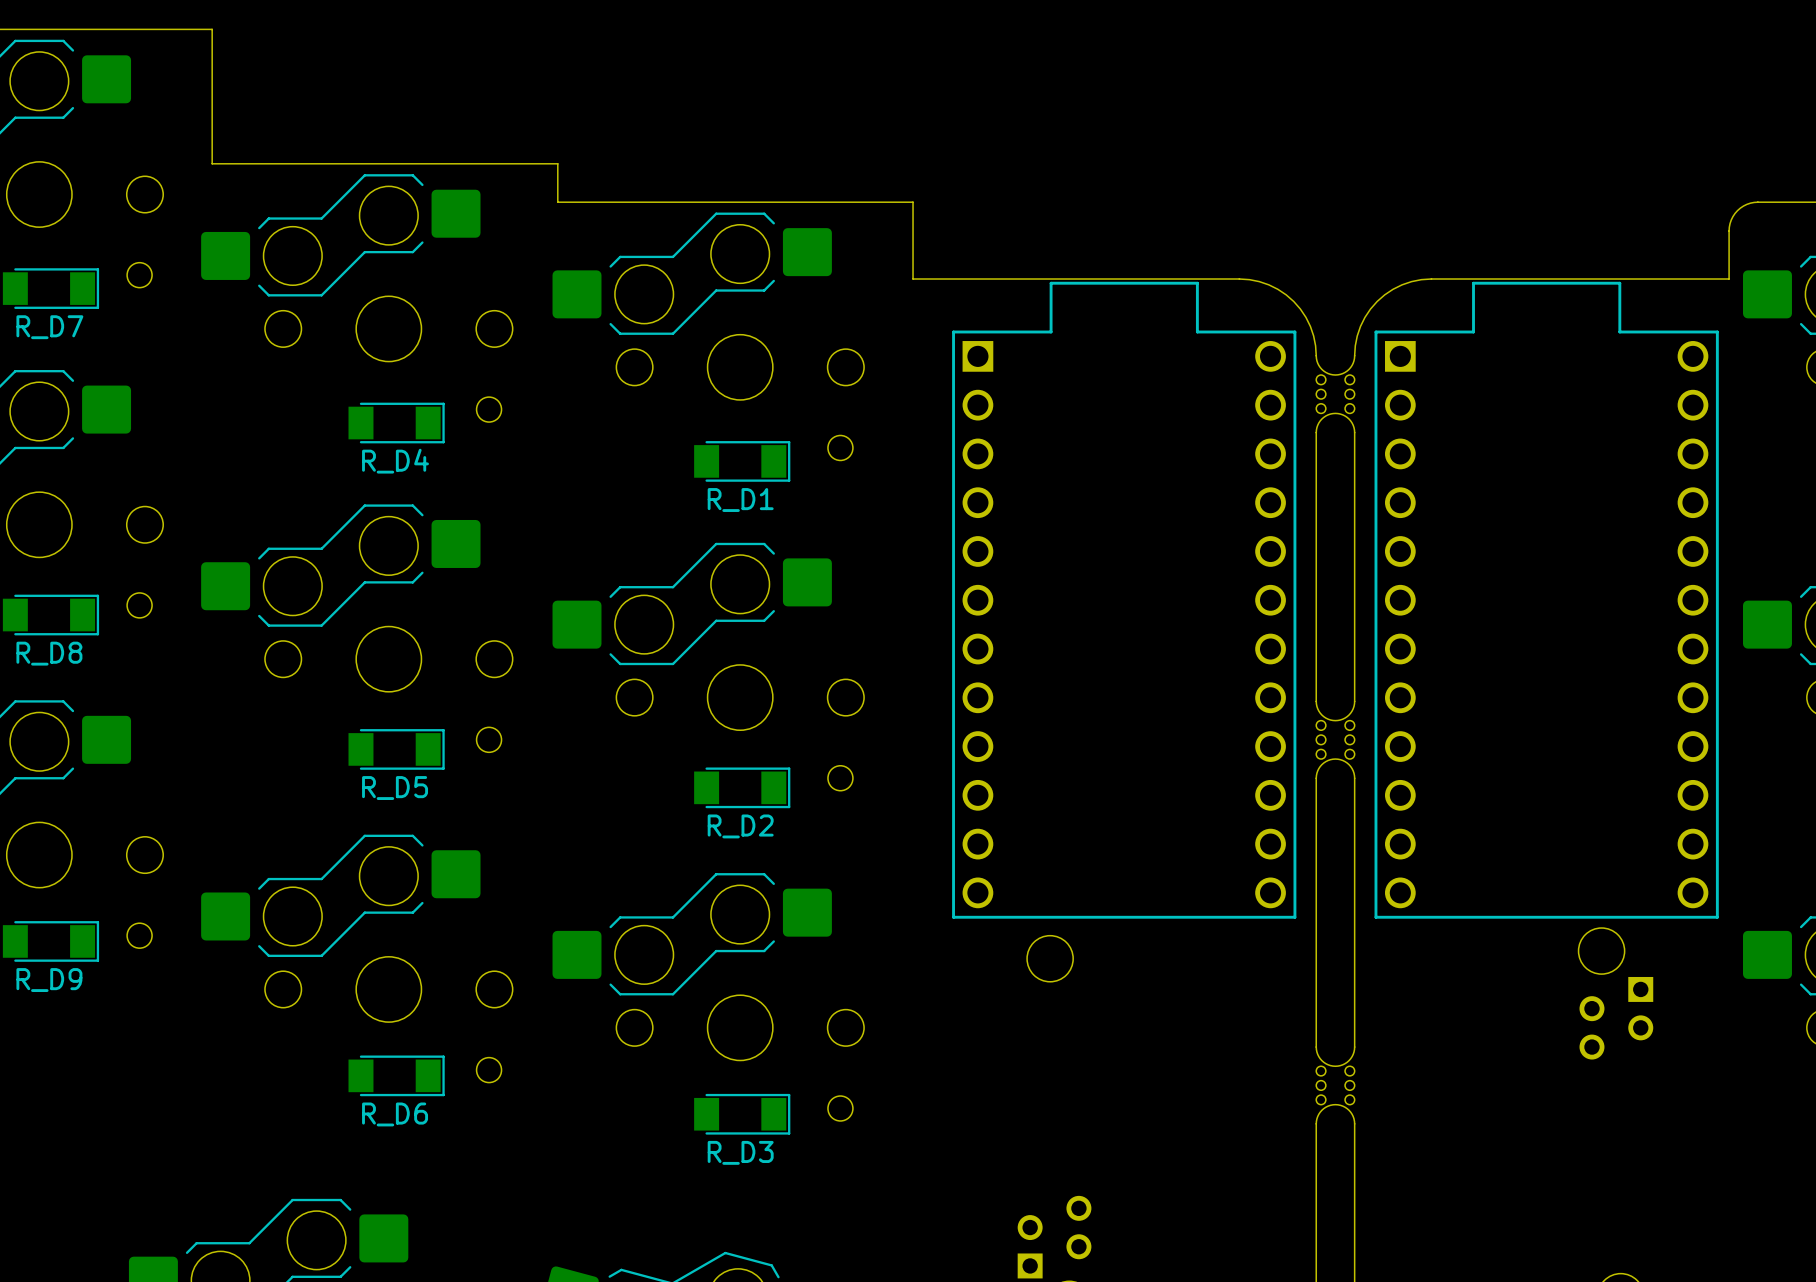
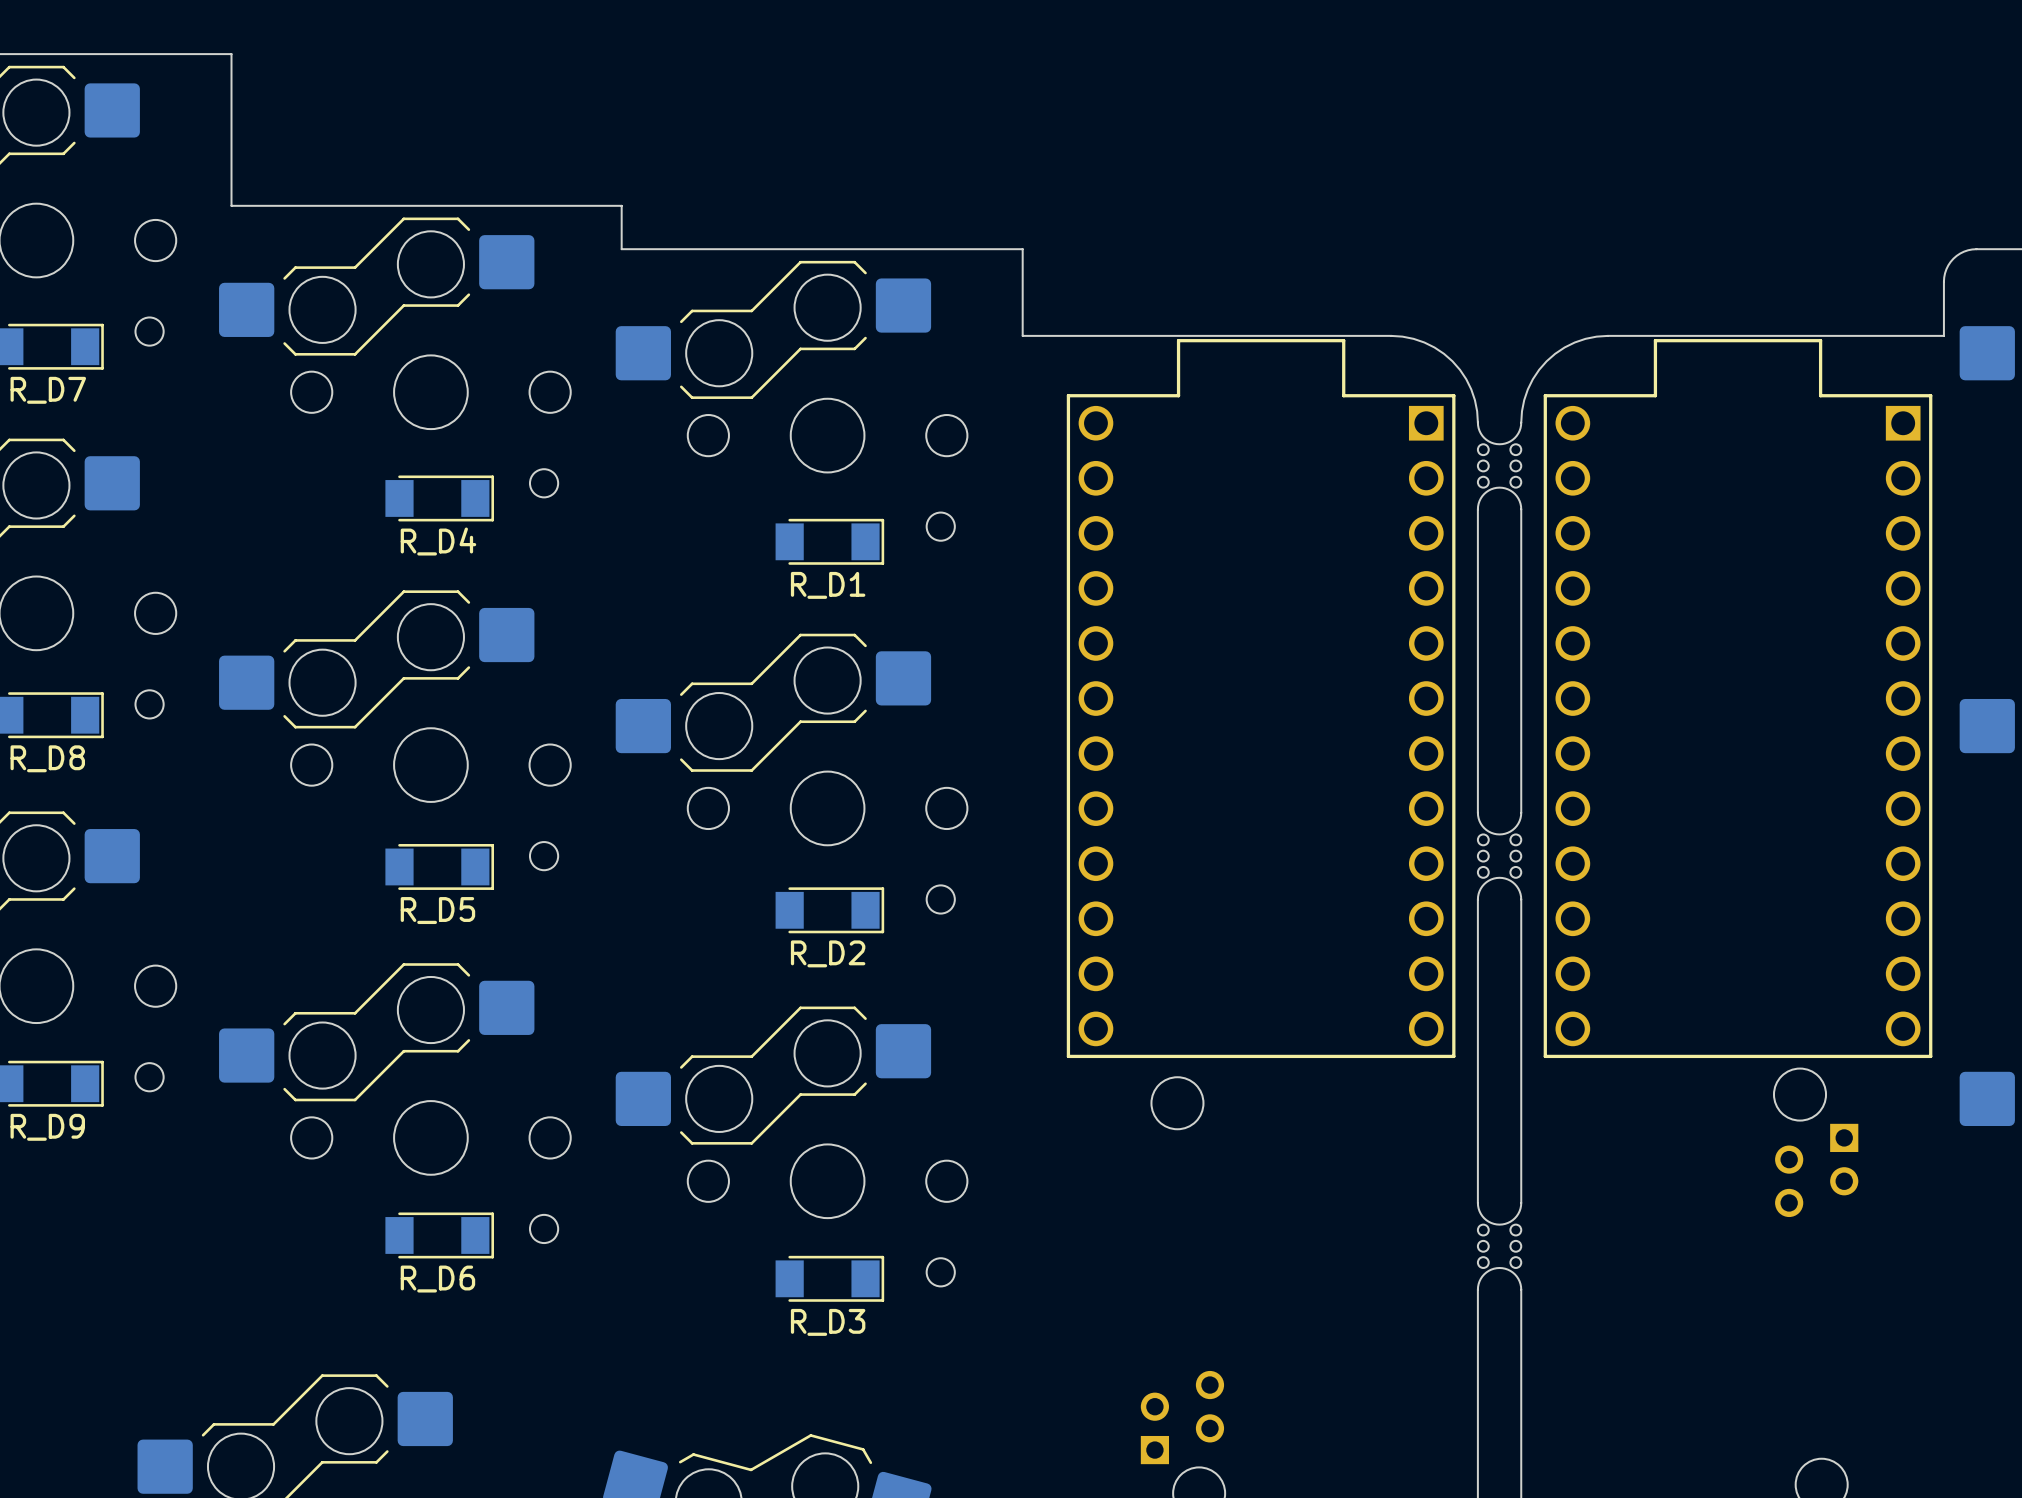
part footprint: [952, 281, 1297, 919] -> [1066, 339, 1456, 1059]
part footprint: [1374, 281, 1719, 919] -> [1543, 339, 1933, 1059]

